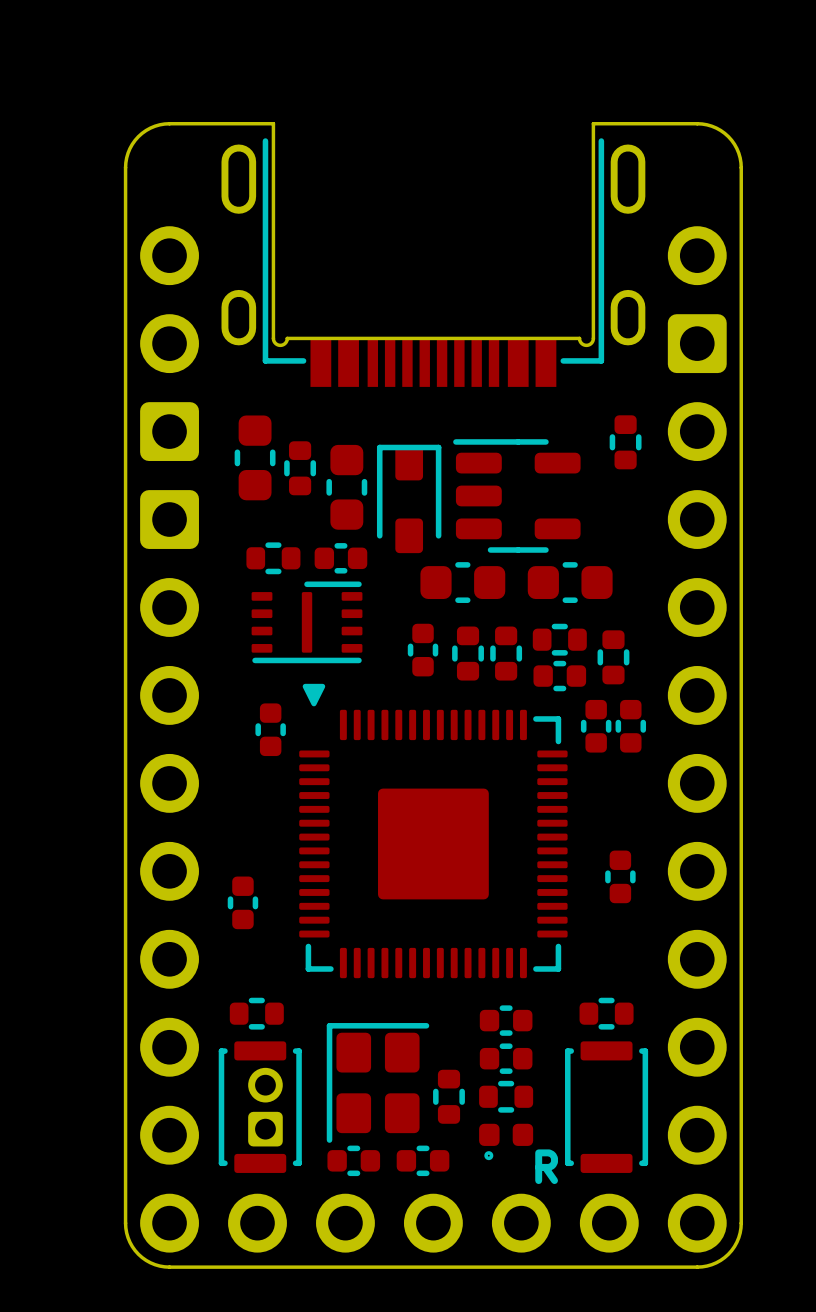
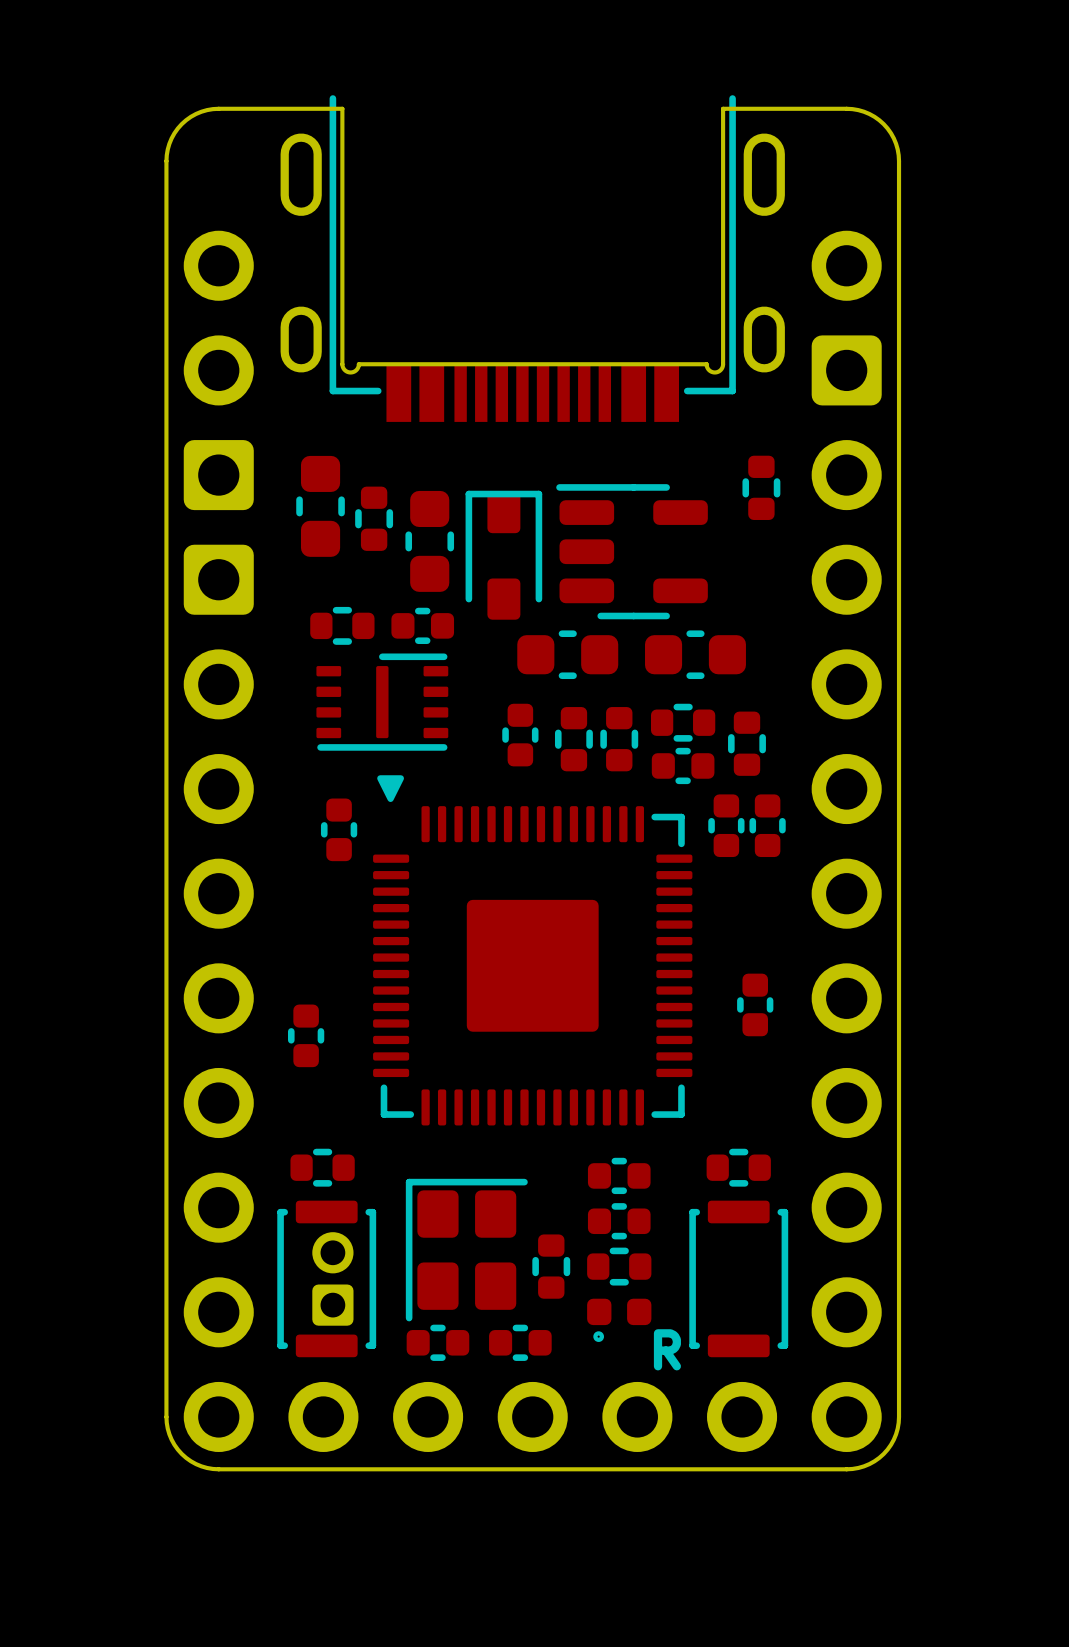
part footprint: [221, 138, 646, 387] -> [280, 95, 785, 422]

